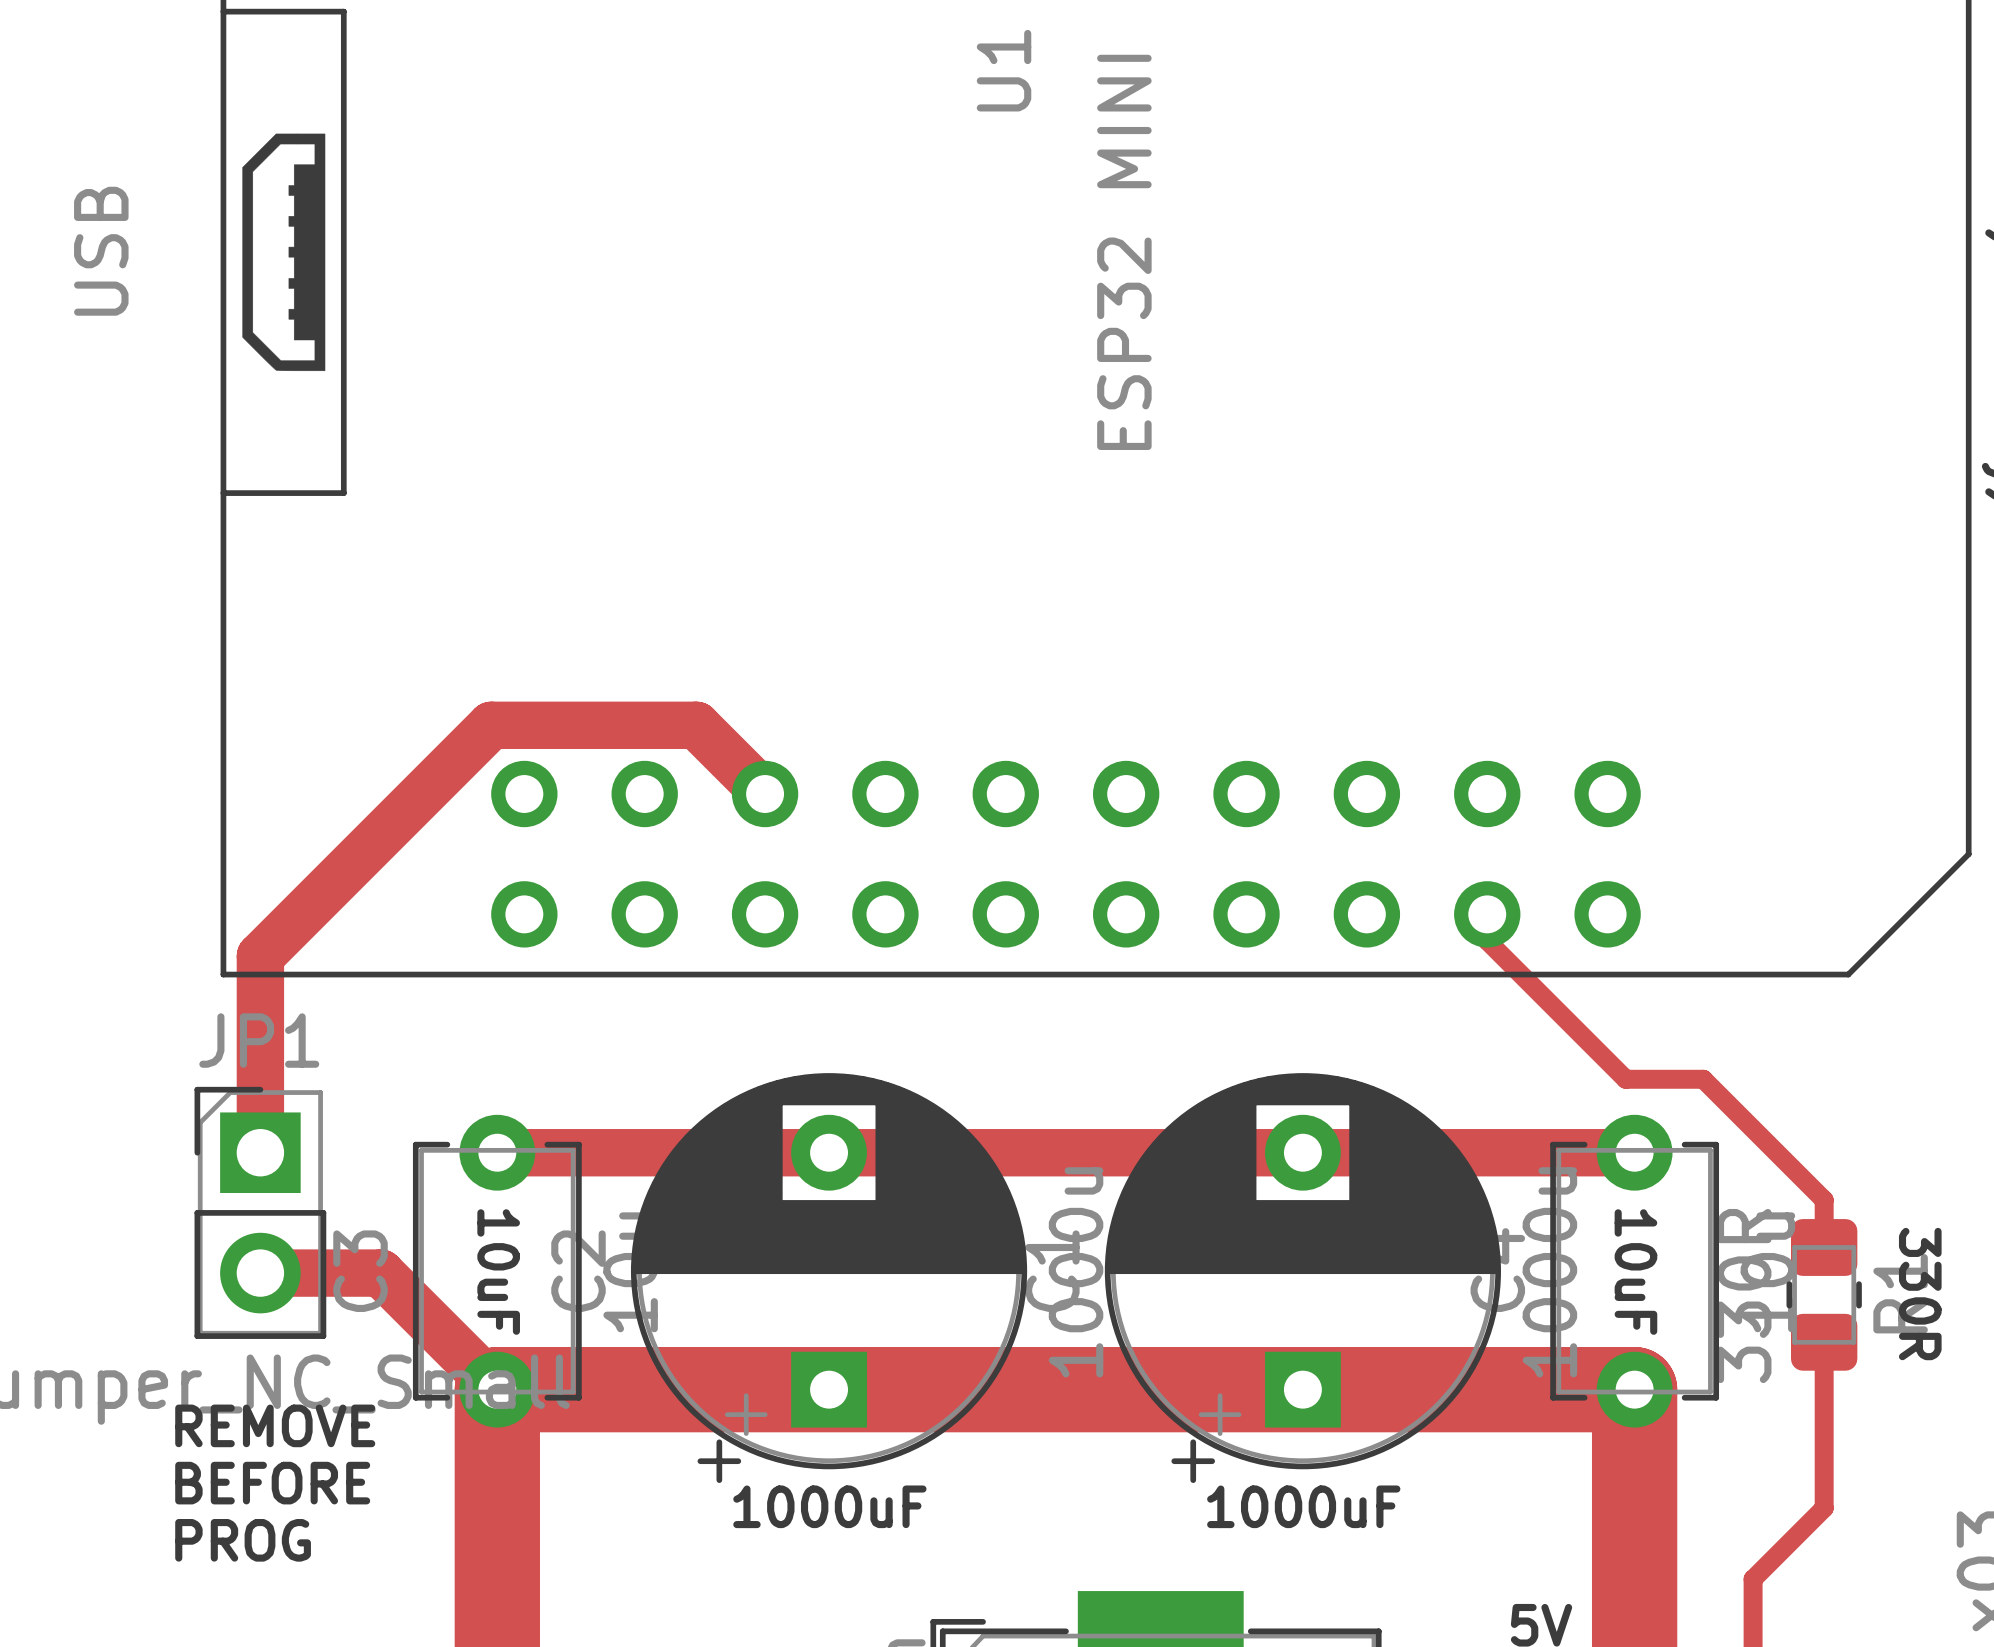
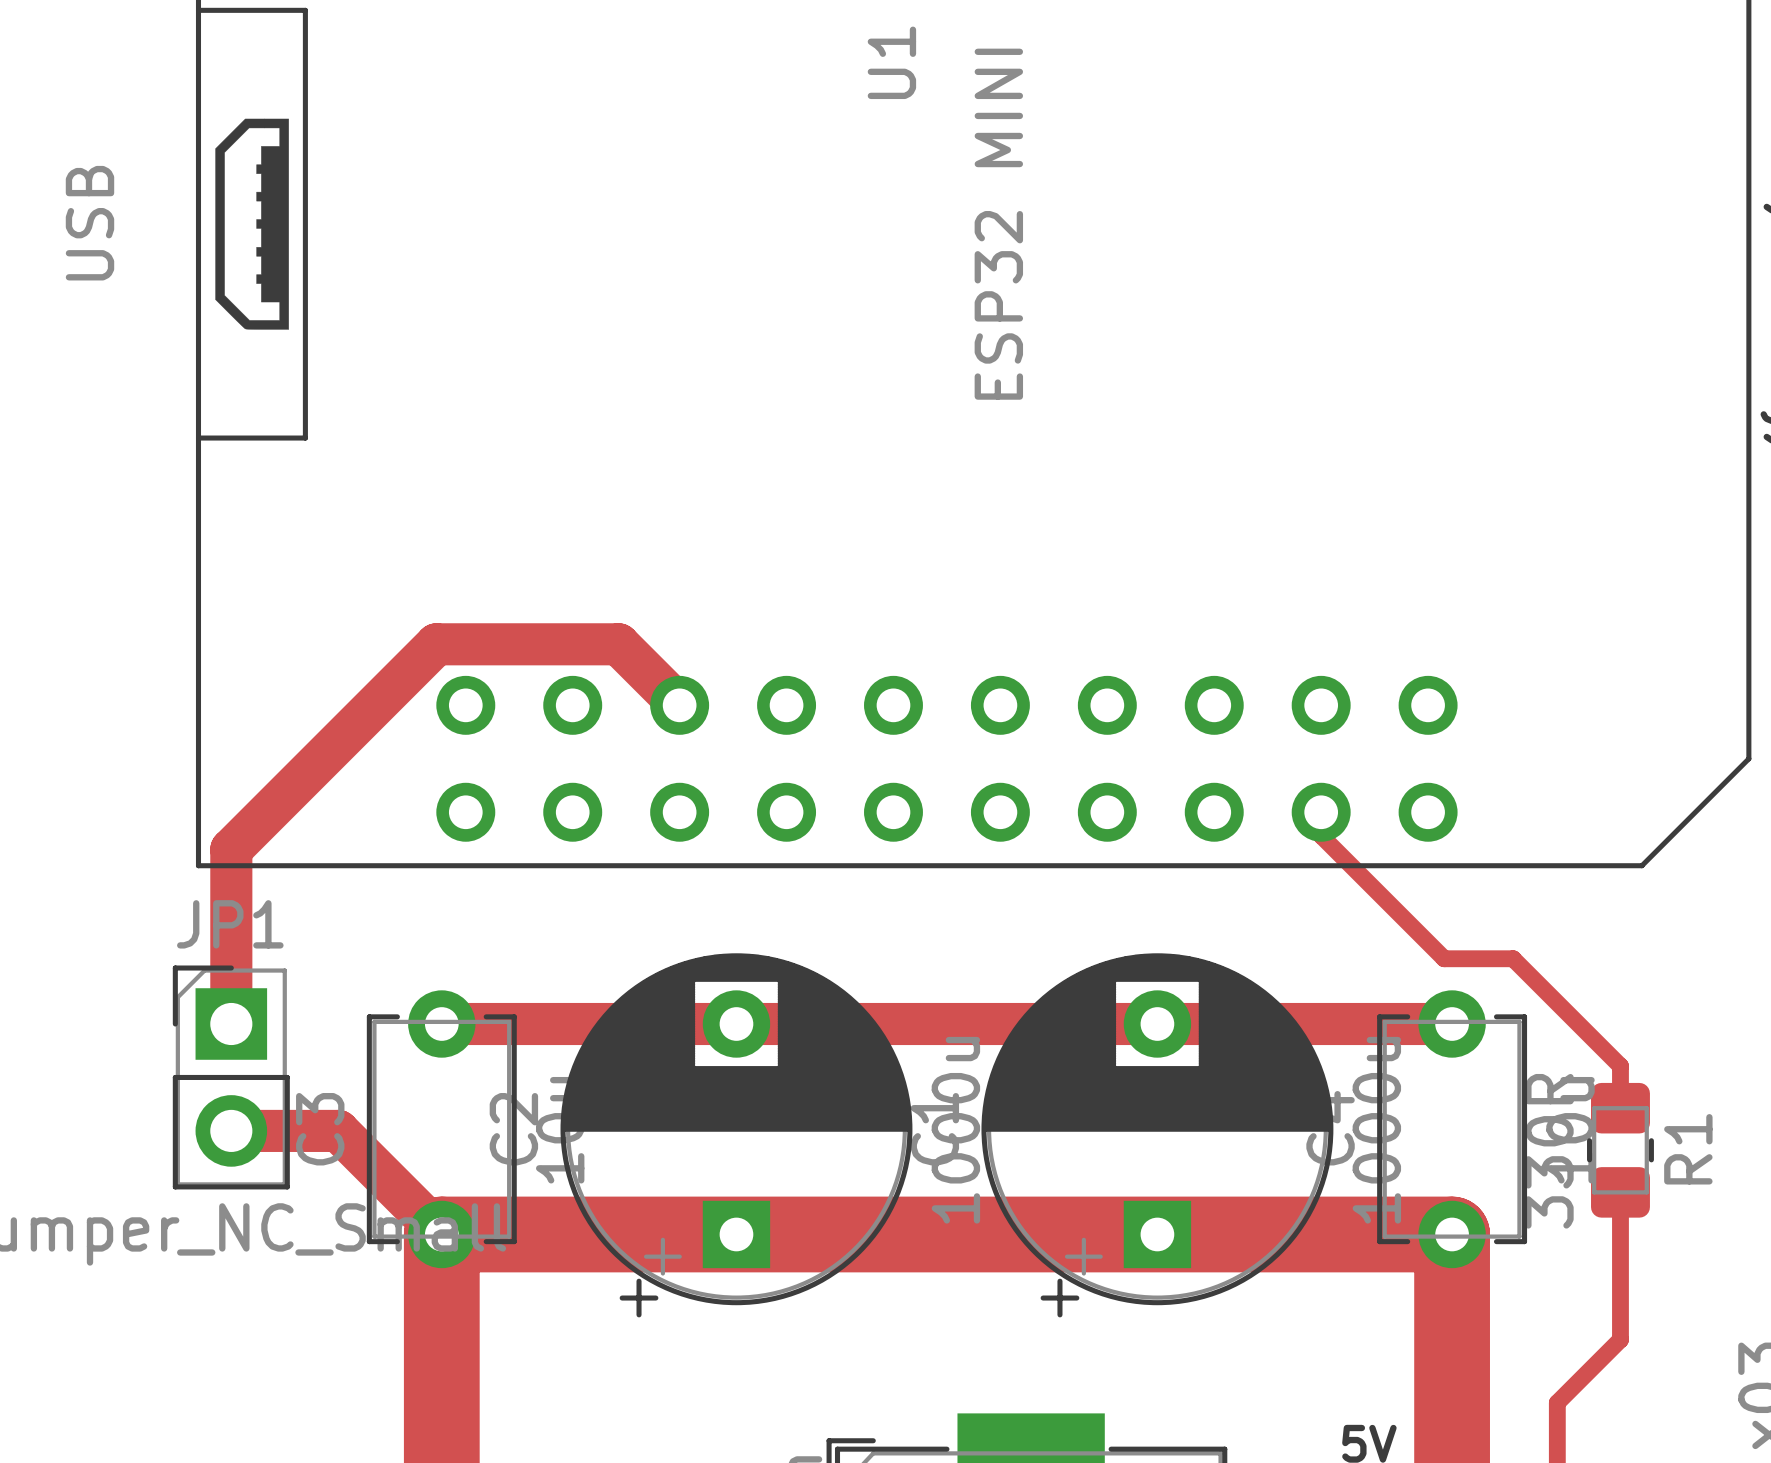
text: 10uF (498, 1272) -> none
text: 10uF (1635, 1272) -> none
text: 330R (1920, 1294) -> none
text: REMOVE (275, 1425) -> none
text: BEFORE (272, 1483) -> none
text: 1000uF (829, 1506) -> none
text: 1000uF (1303, 1506) -> none
text: PROG (243, 1540) -> none

